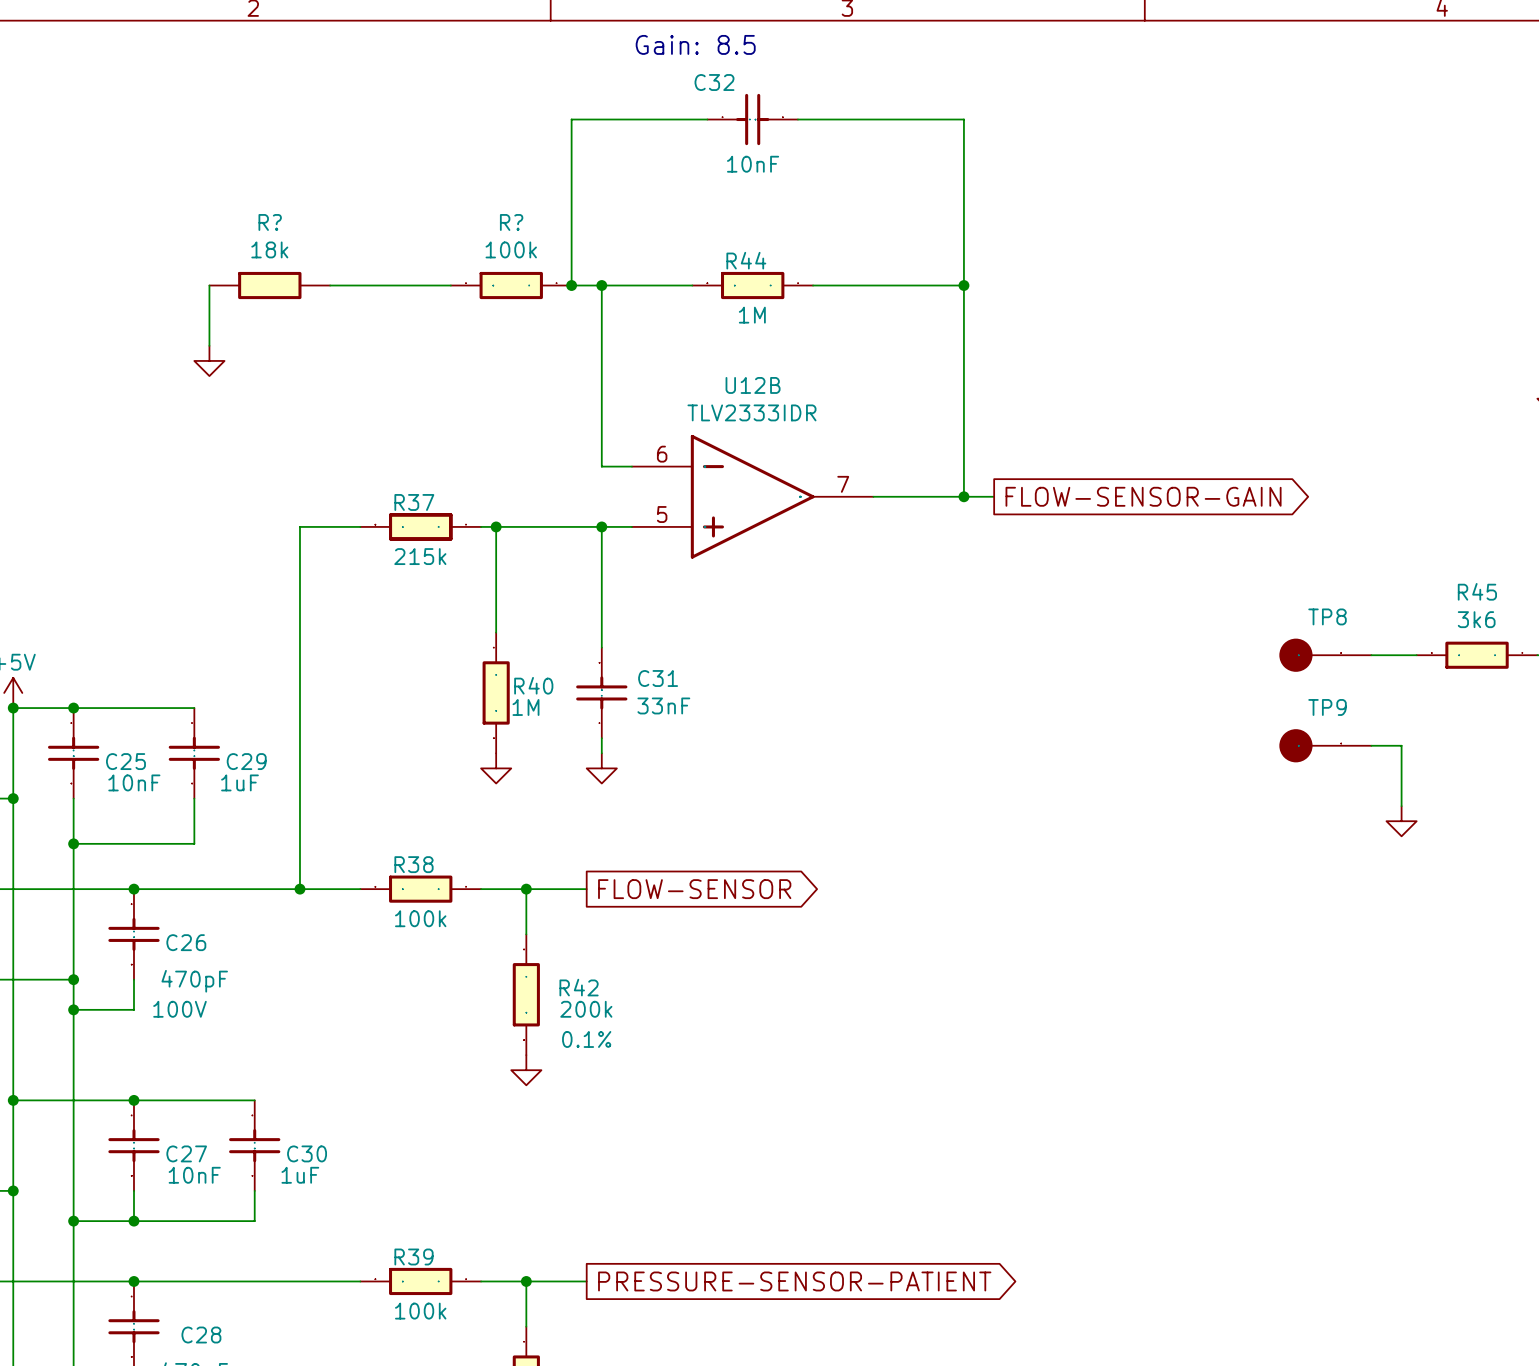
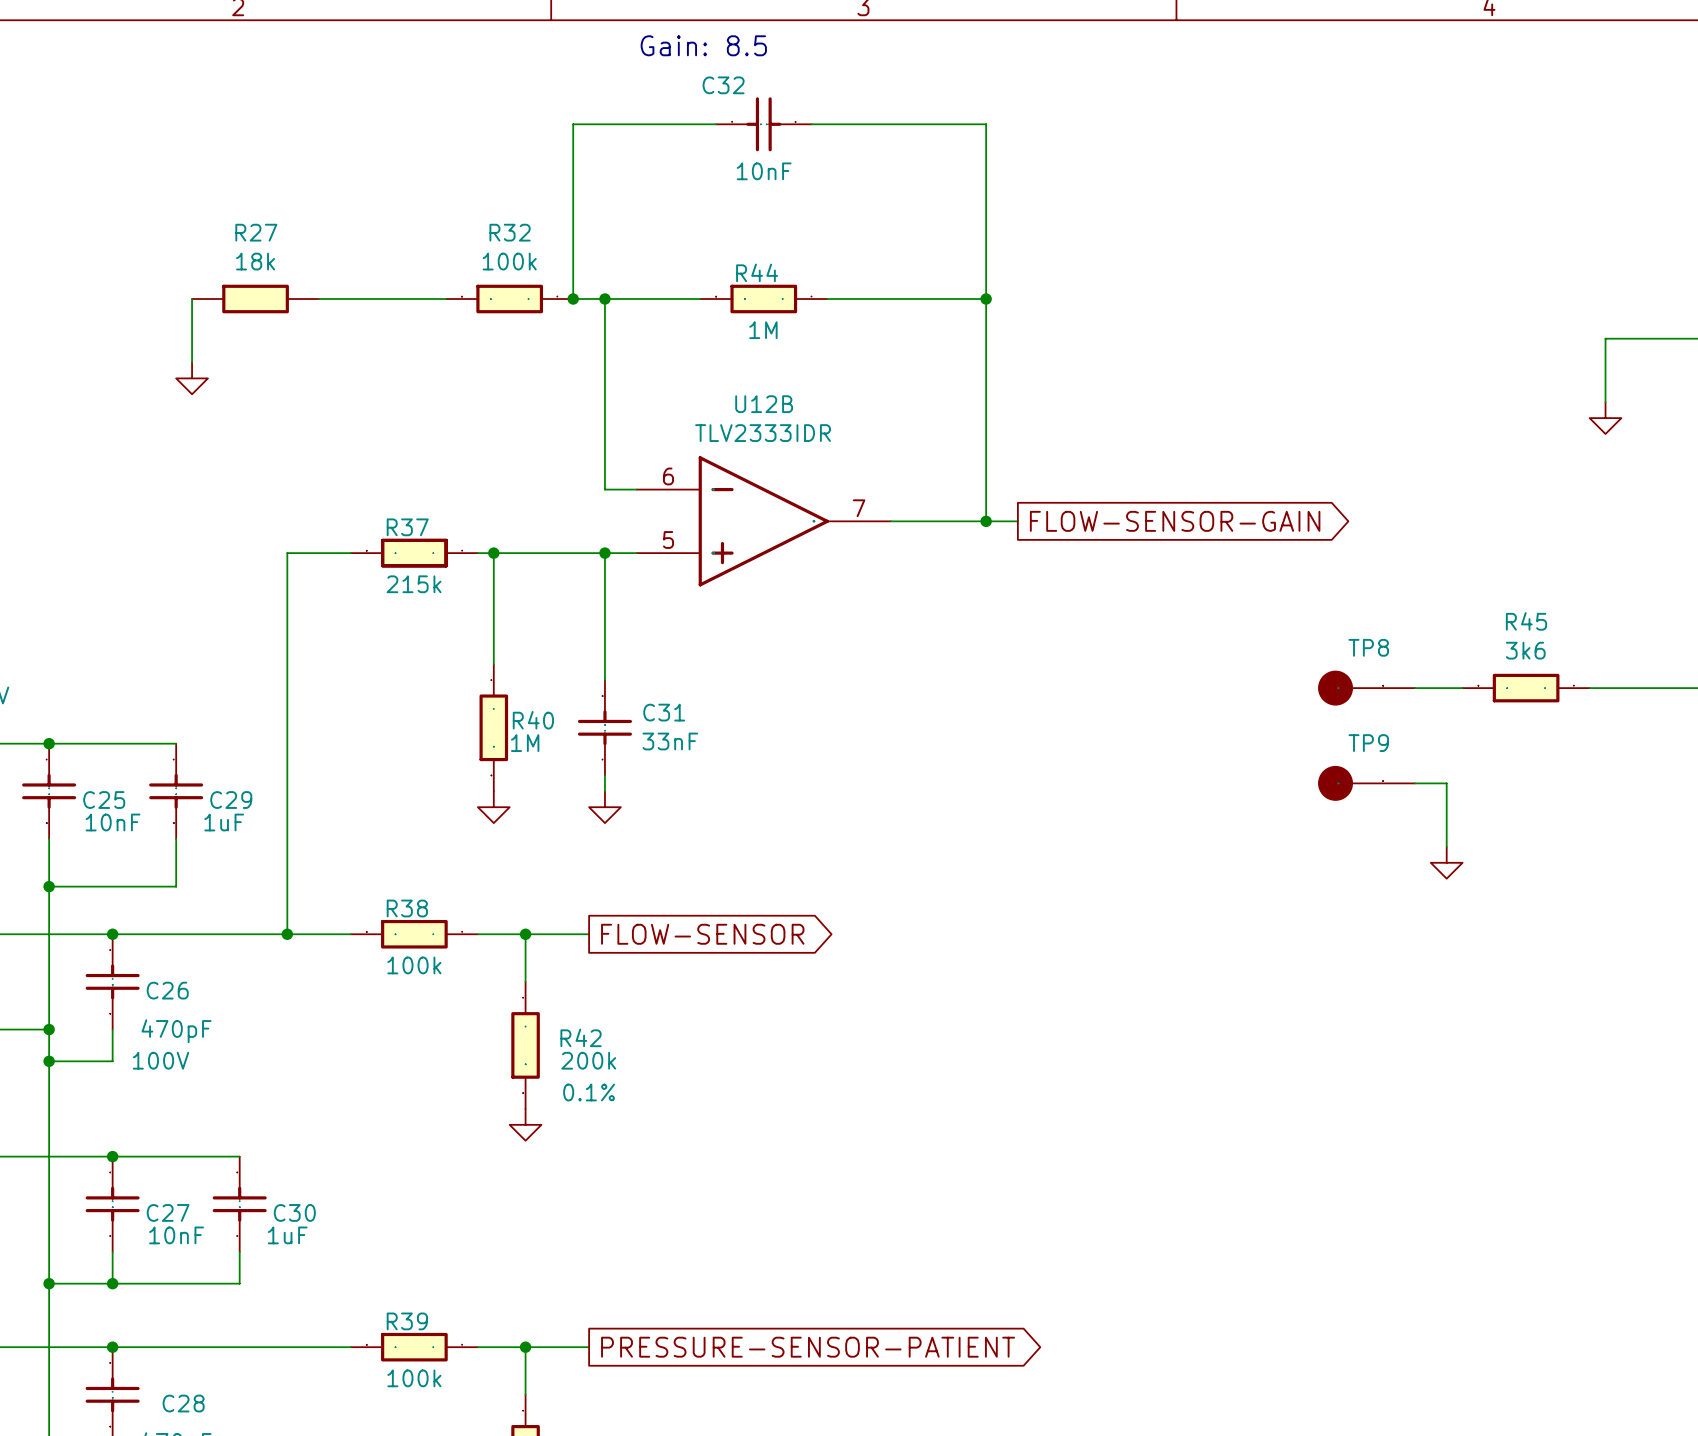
R? name: R? (270, 222) -> R27 (256, 232)
R? name: R? (511, 222) -> R32 (510, 232)

